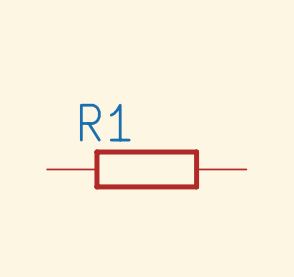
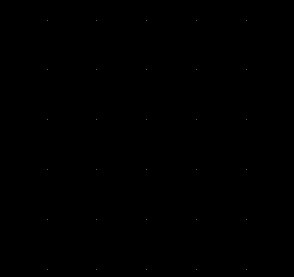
R1: (146, 169) -> none

